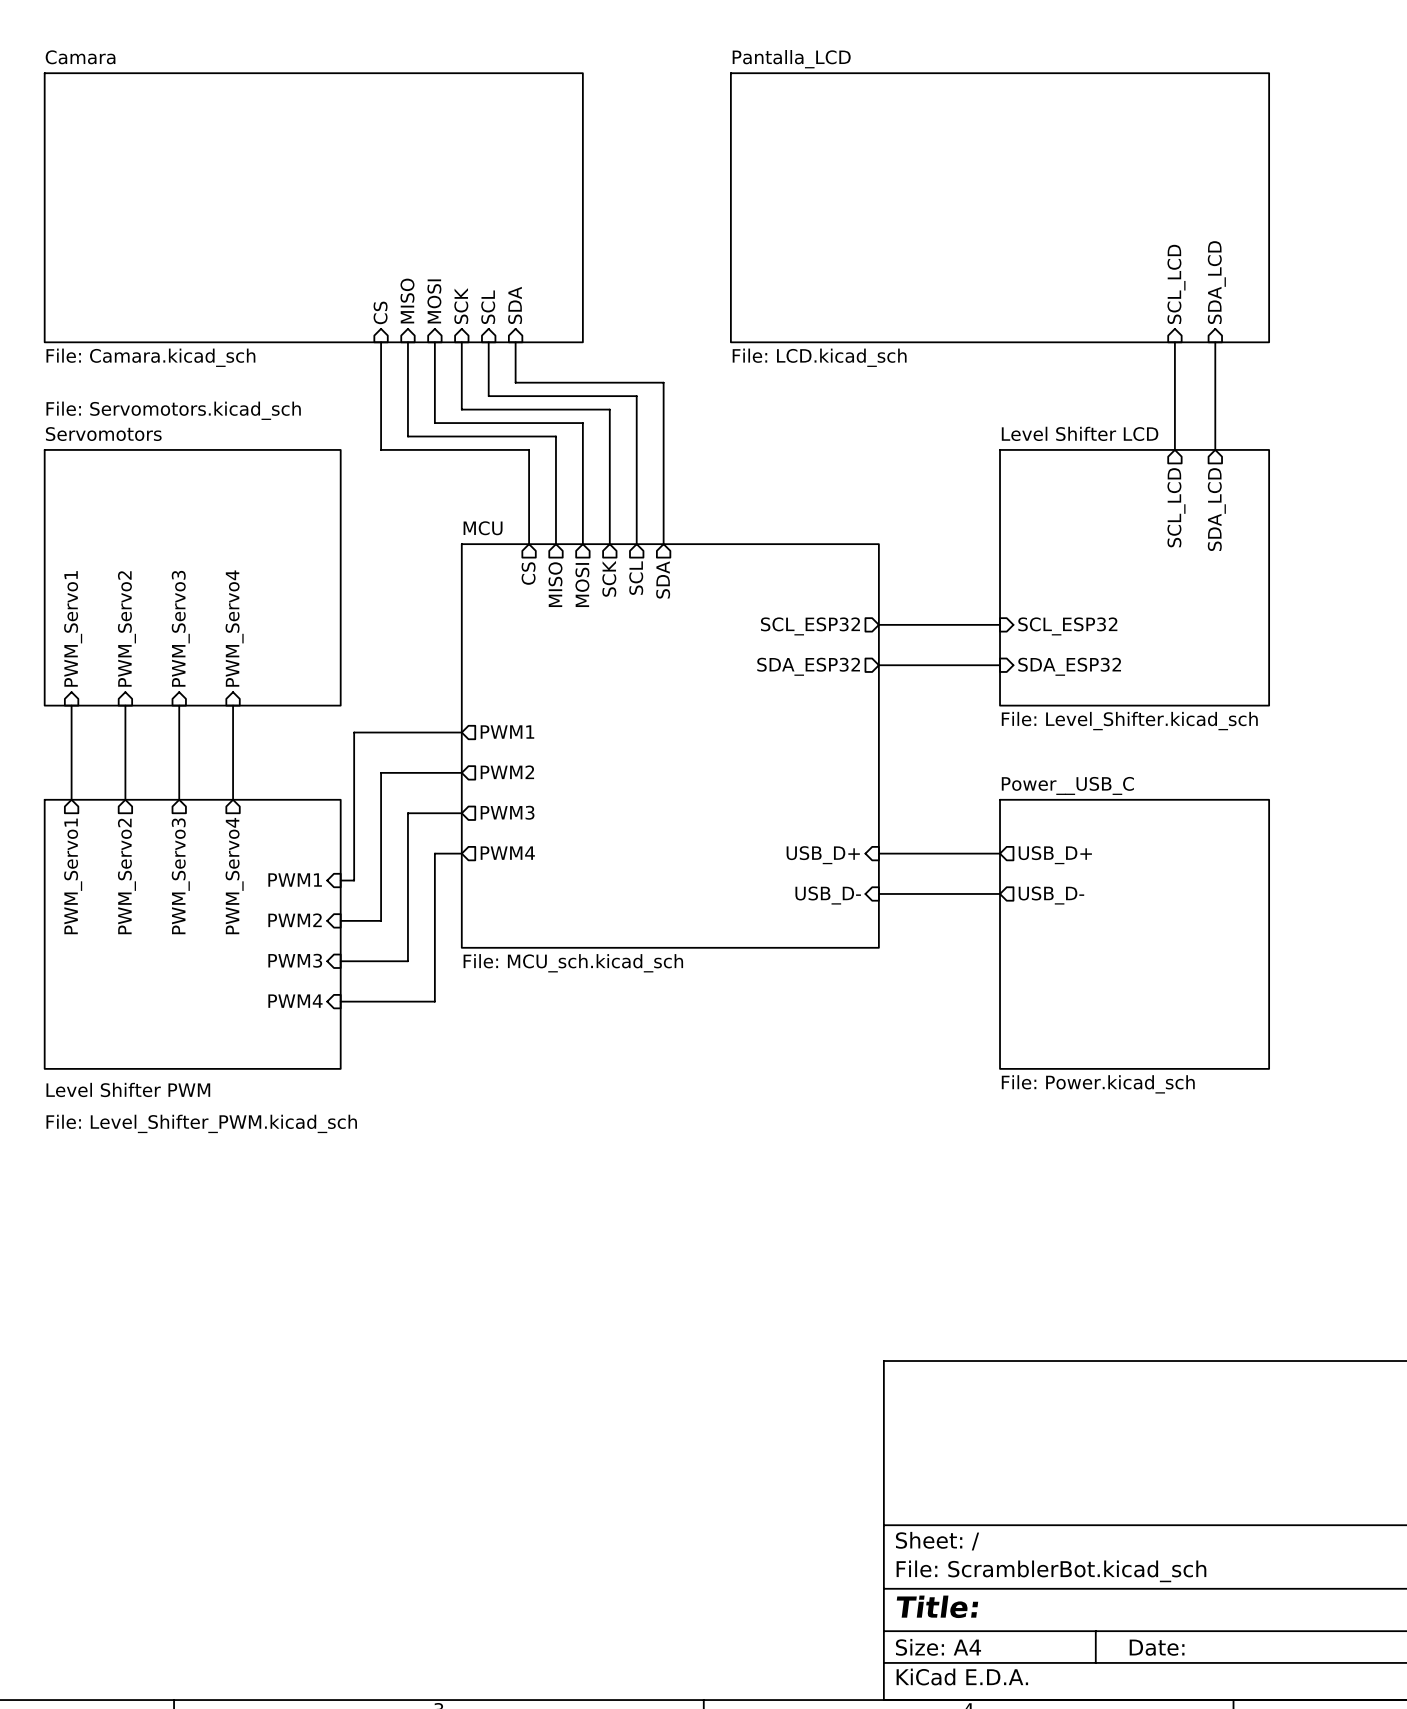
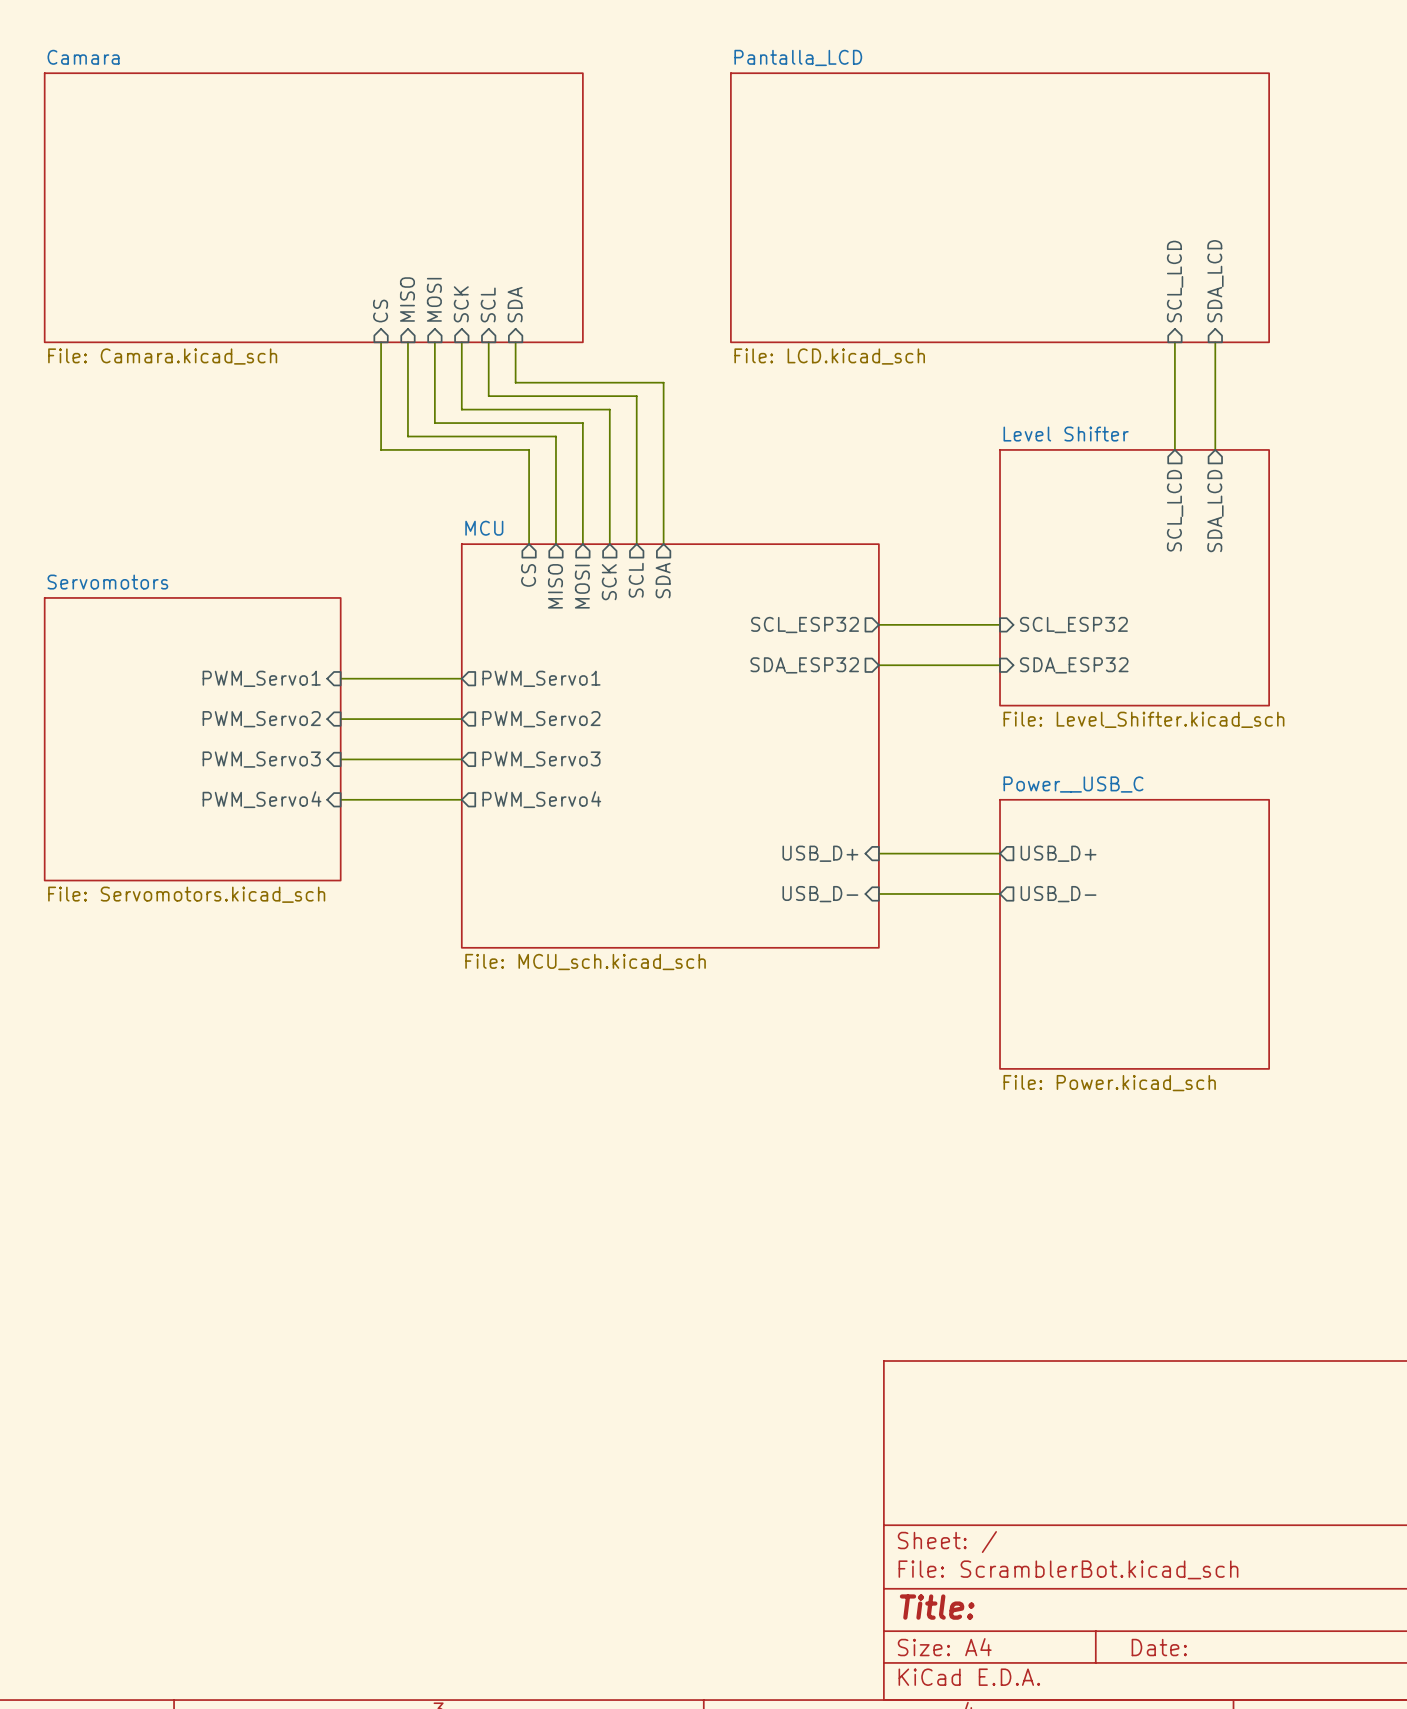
sheet Level Shifter LCD name: Level Shifter LCD (1080, 433) -> Level Shifter (1066, 434)
sheet Servomotors: File: Servomotors.kicad_sch (192, 577) -> none
sheet pin: PWM_Servo1 (73, 628) -> none
sheet pin: PWM_Servo2 (126, 628) -> none
sheet pin: PWM_Servo3 (180, 628) -> none
sheet pin: PWM_Servo4 (234, 628) -> none
wire: none -> (340, 678) (461, 678)
sheet pin: none -> PWM_Servo1 (261, 678)
sheet pin: none -> PWM_Servo1 (541, 678)
wire: (71, 705) (71, 799) -> none
wire: (125, 705) (125, 799) -> none
wire: (179, 705) (179, 799) -> none
wire: (233, 705) (233, 799) -> none
wire: none -> (340, 719) (461, 719)
sheet pin: none -> PWM_Servo2 (261, 719)
sheet pin: none -> PWM_Servo2 (541, 719)
wire: (461, 732) (354, 732) (354, 880) (340, 880) -> none
sheet pin: PWM1 (507, 732) -> none
sheet Servomotors: none -> File: Servomotors.kicad_sch (192, 739)
wire: none -> (340, 759) (461, 759)
sheet pin: none -> PWM_Servo3 (261, 759)
sheet pin: none -> PWM_Servo3 (541, 759)
wire: (461, 772) (381, 772) (381, 920) (340, 920) -> none
sheet pin: PWM2 (507, 772) -> none
wire: none -> (340, 799) (461, 799)
sheet pin: none -> PWM_Servo4 (262, 799)
sheet pin: none -> PWM_Servo4 (541, 799)
sheet pin: PWM3 (507, 812) -> none
wire: (461, 813) (407, 813) (407, 961) (340, 961) -> none
wire: (461, 853) (434, 853) (434, 1001) (340, 1001) -> none
sheet pin: PWM4 (507, 853) -> none
sheet pin: PWM_Servo1 (73, 876) -> none
sheet pin: PWM_Servo2 (126, 876) -> none
sheet pin: PWM_Servo3 (180, 876) -> none
sheet pin: PWM_Servo4 (234, 876) -> none
sheet pin: PWM1 (295, 880) -> none
sheet pin: PWM2 (295, 920) -> none
sheet Level Shifter PWM: File: Level_Shifter_PWM.kicad_sch (192, 934) -> none
sheet pin: PWM3 (295, 960) -> none
sheet pin: PWM4 (295, 1001) -> none

